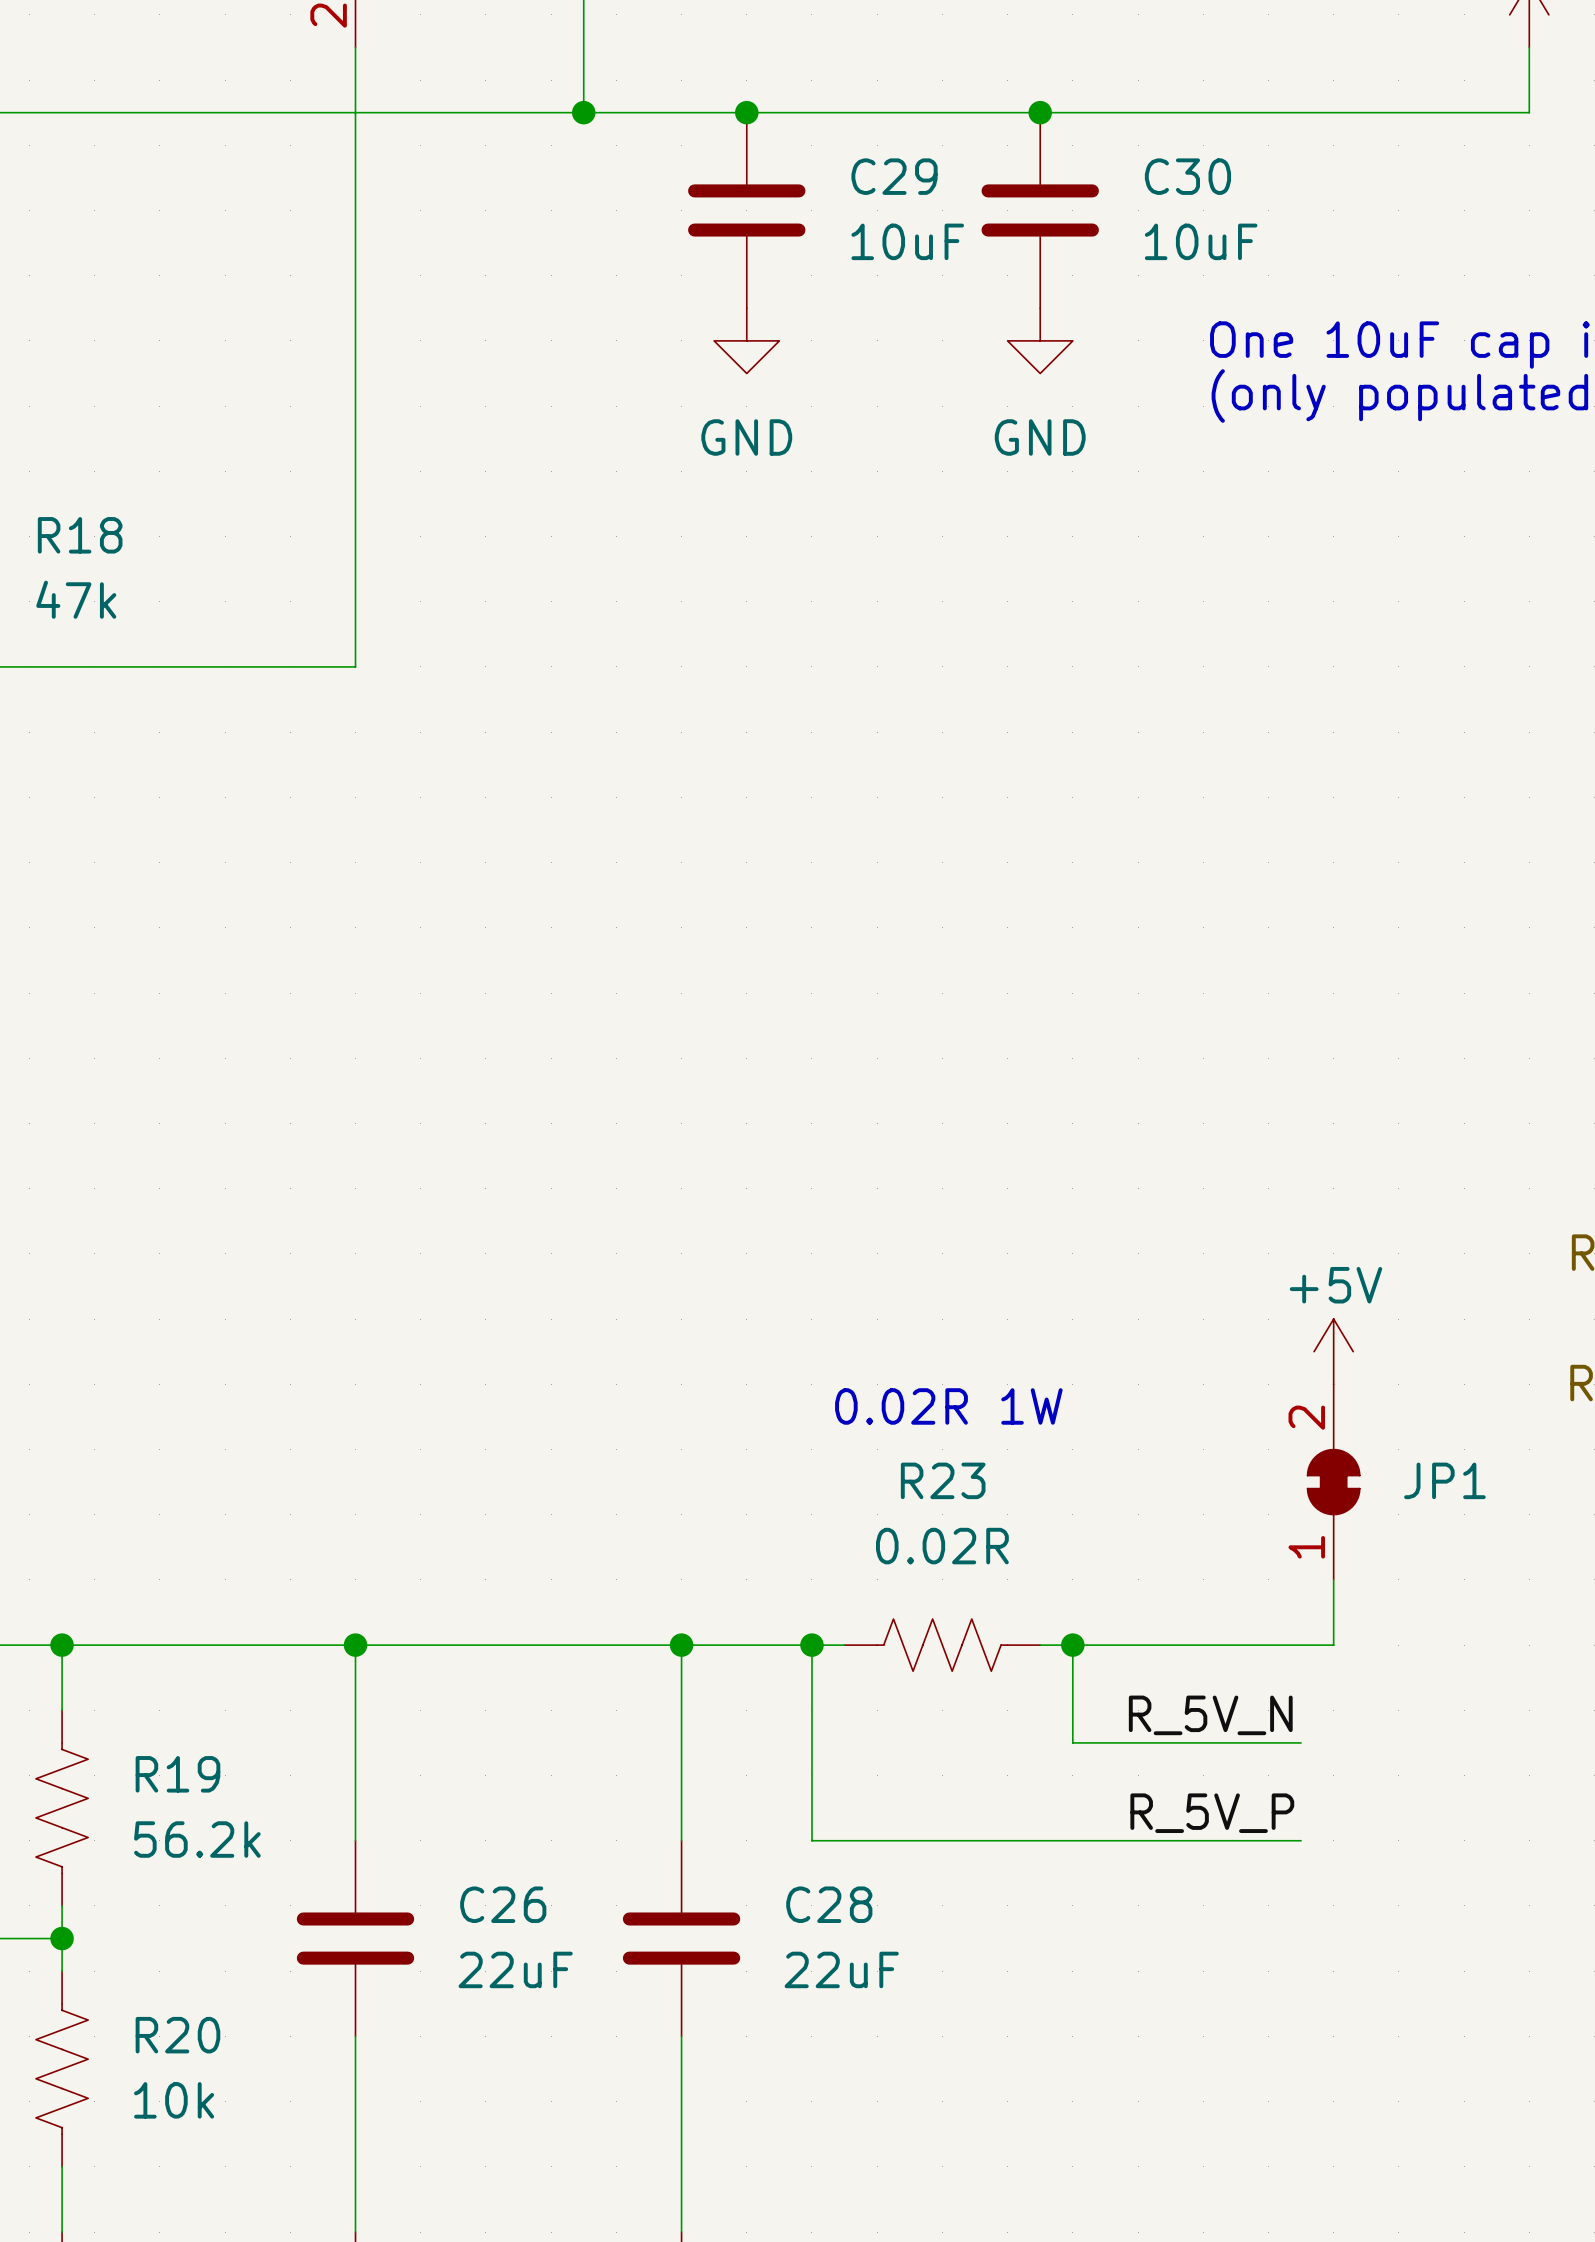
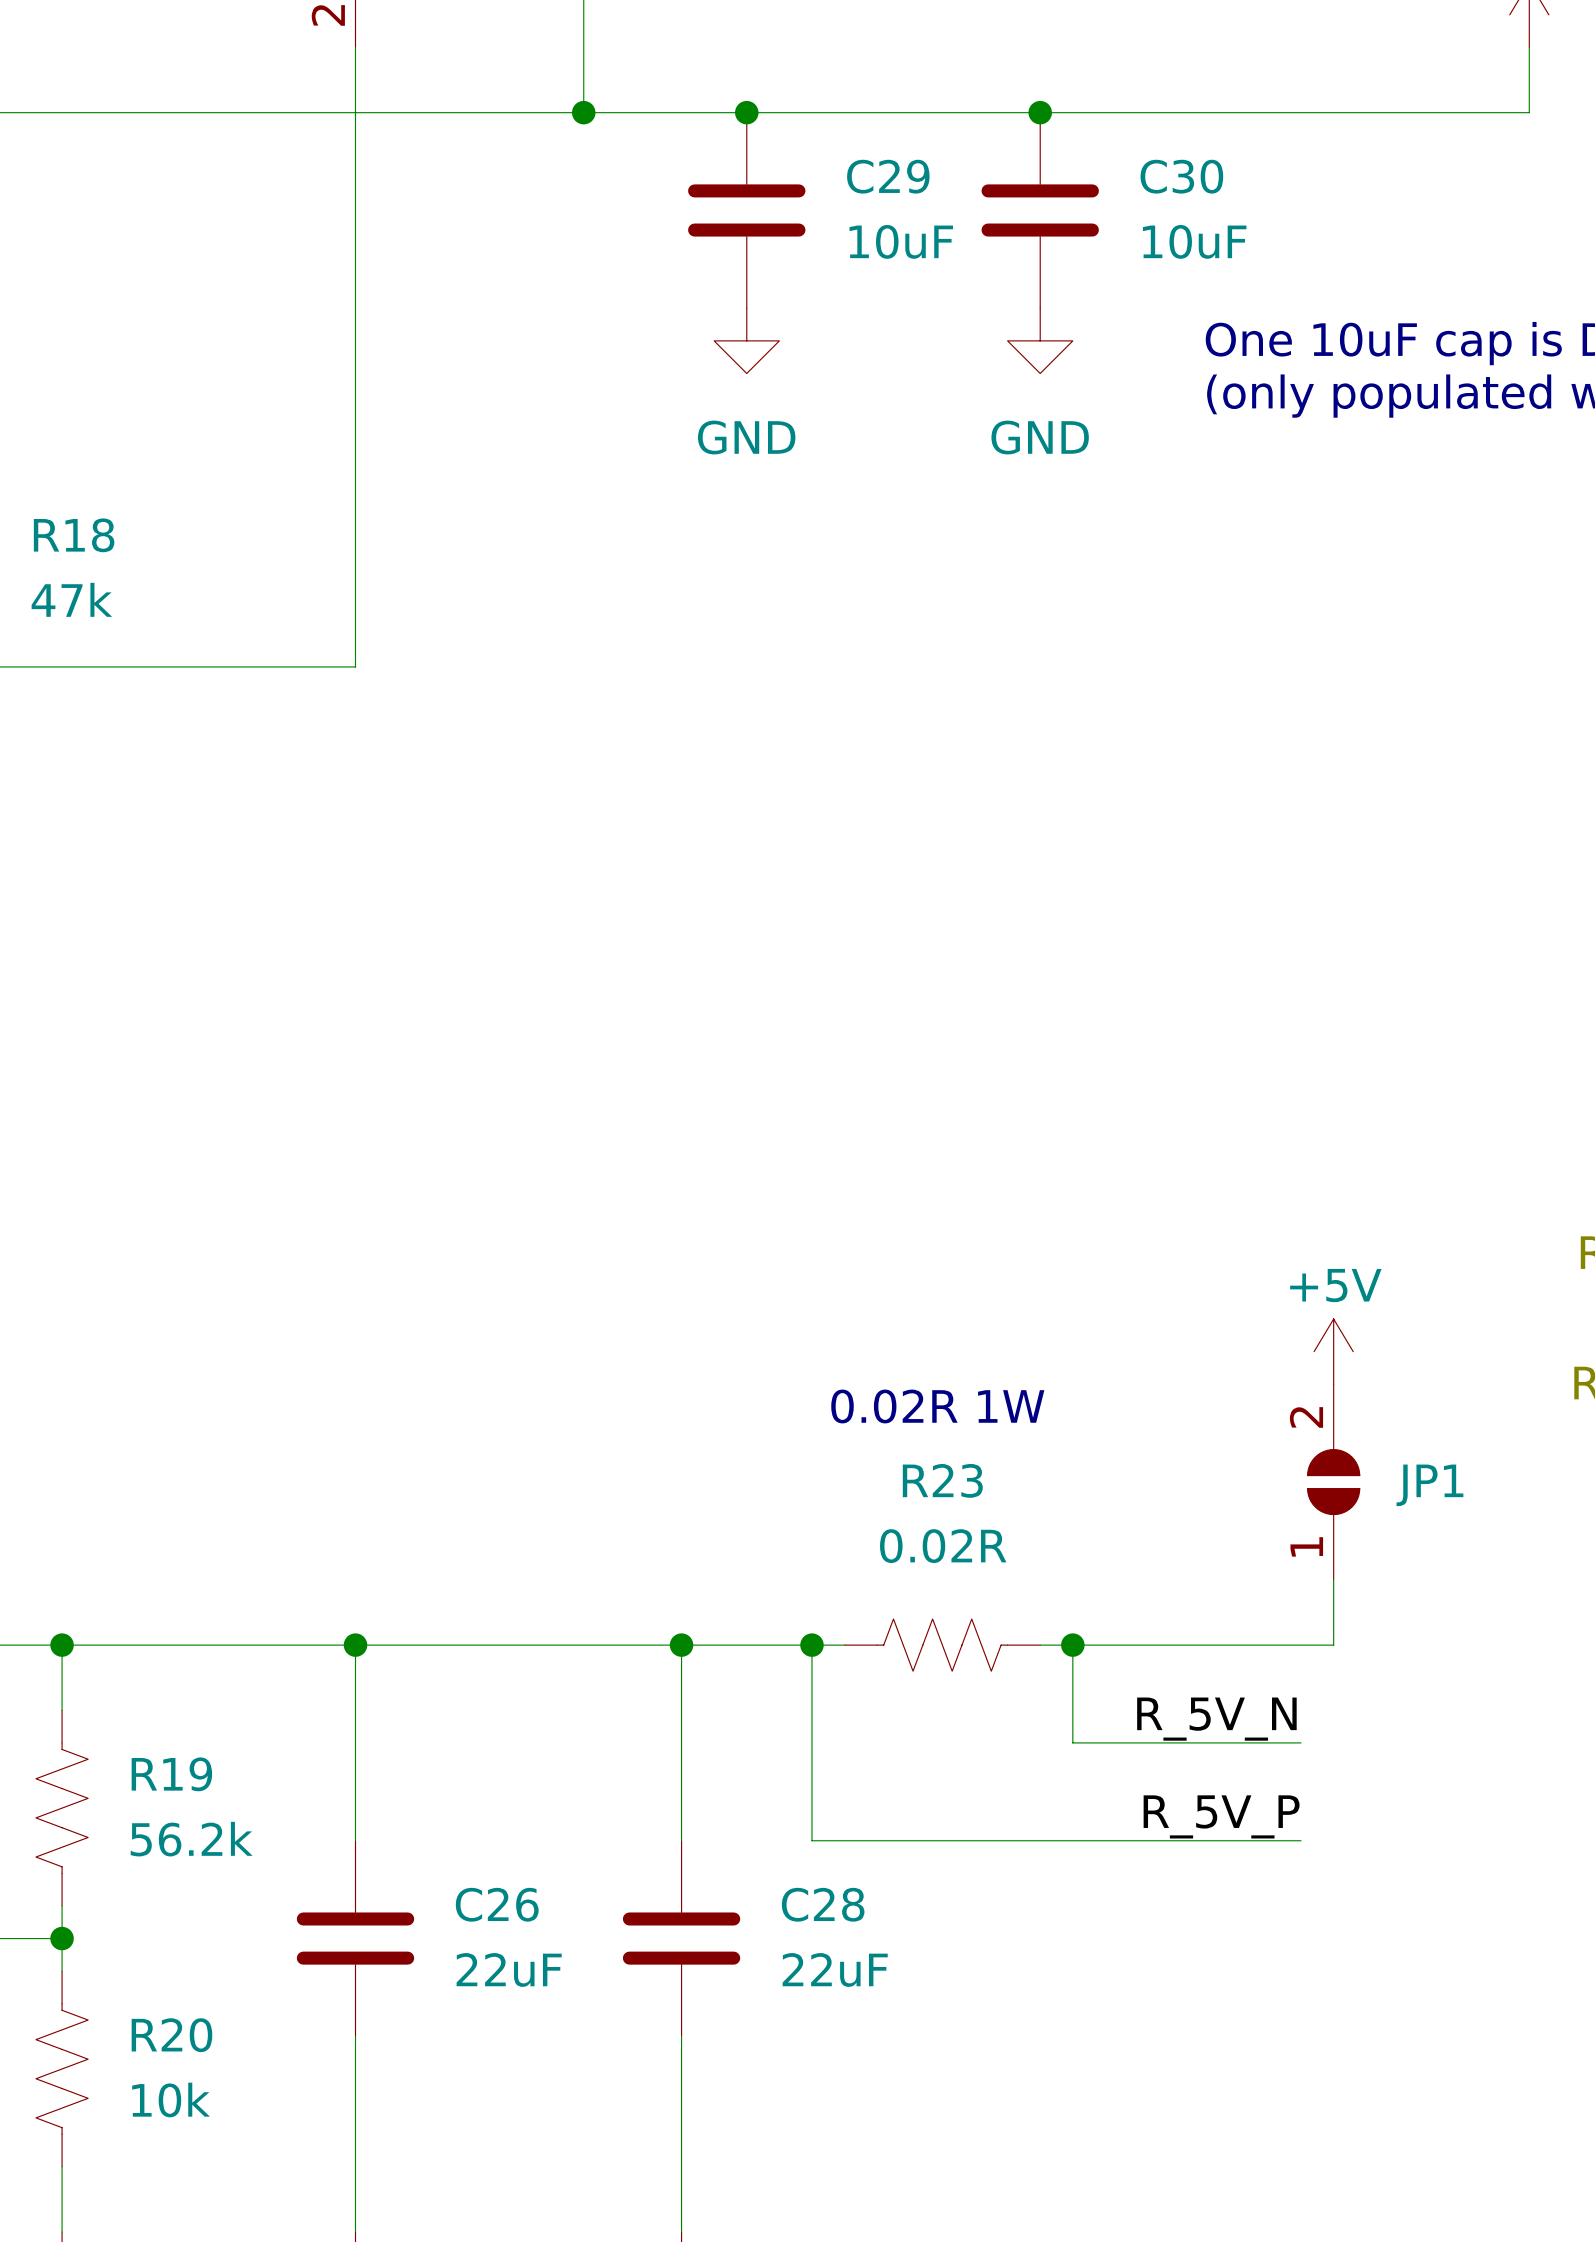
JP1 symbol: [1307, 1384, 1360, 1580] -> [1307, 1384, 1360, 1580]

